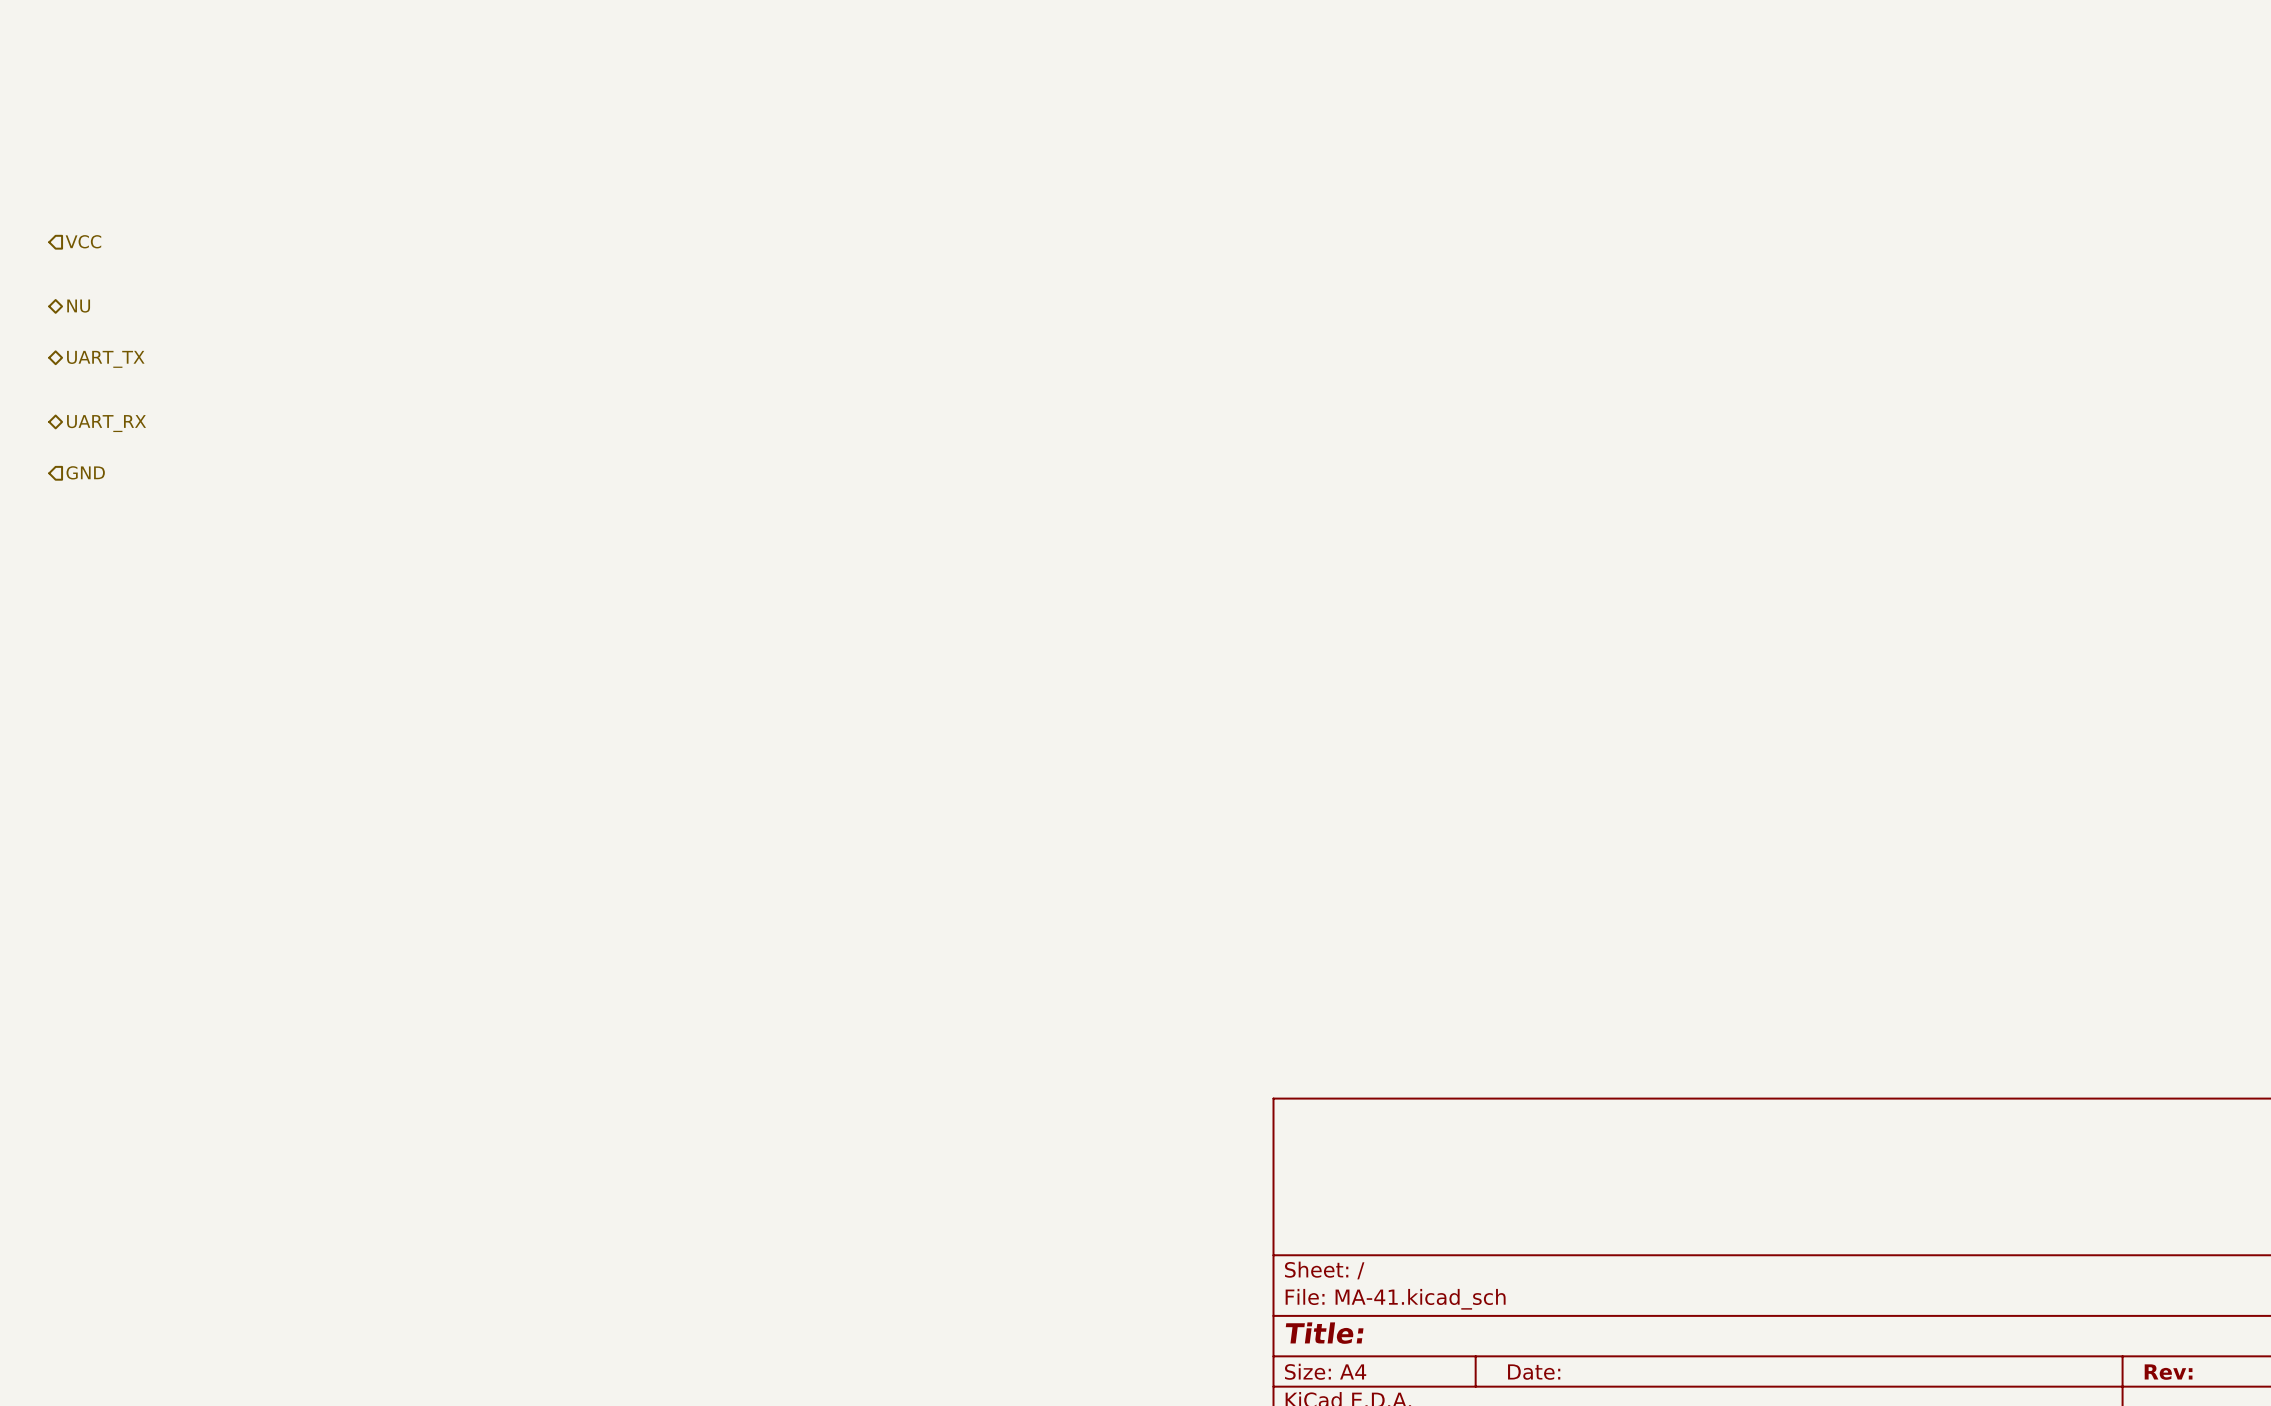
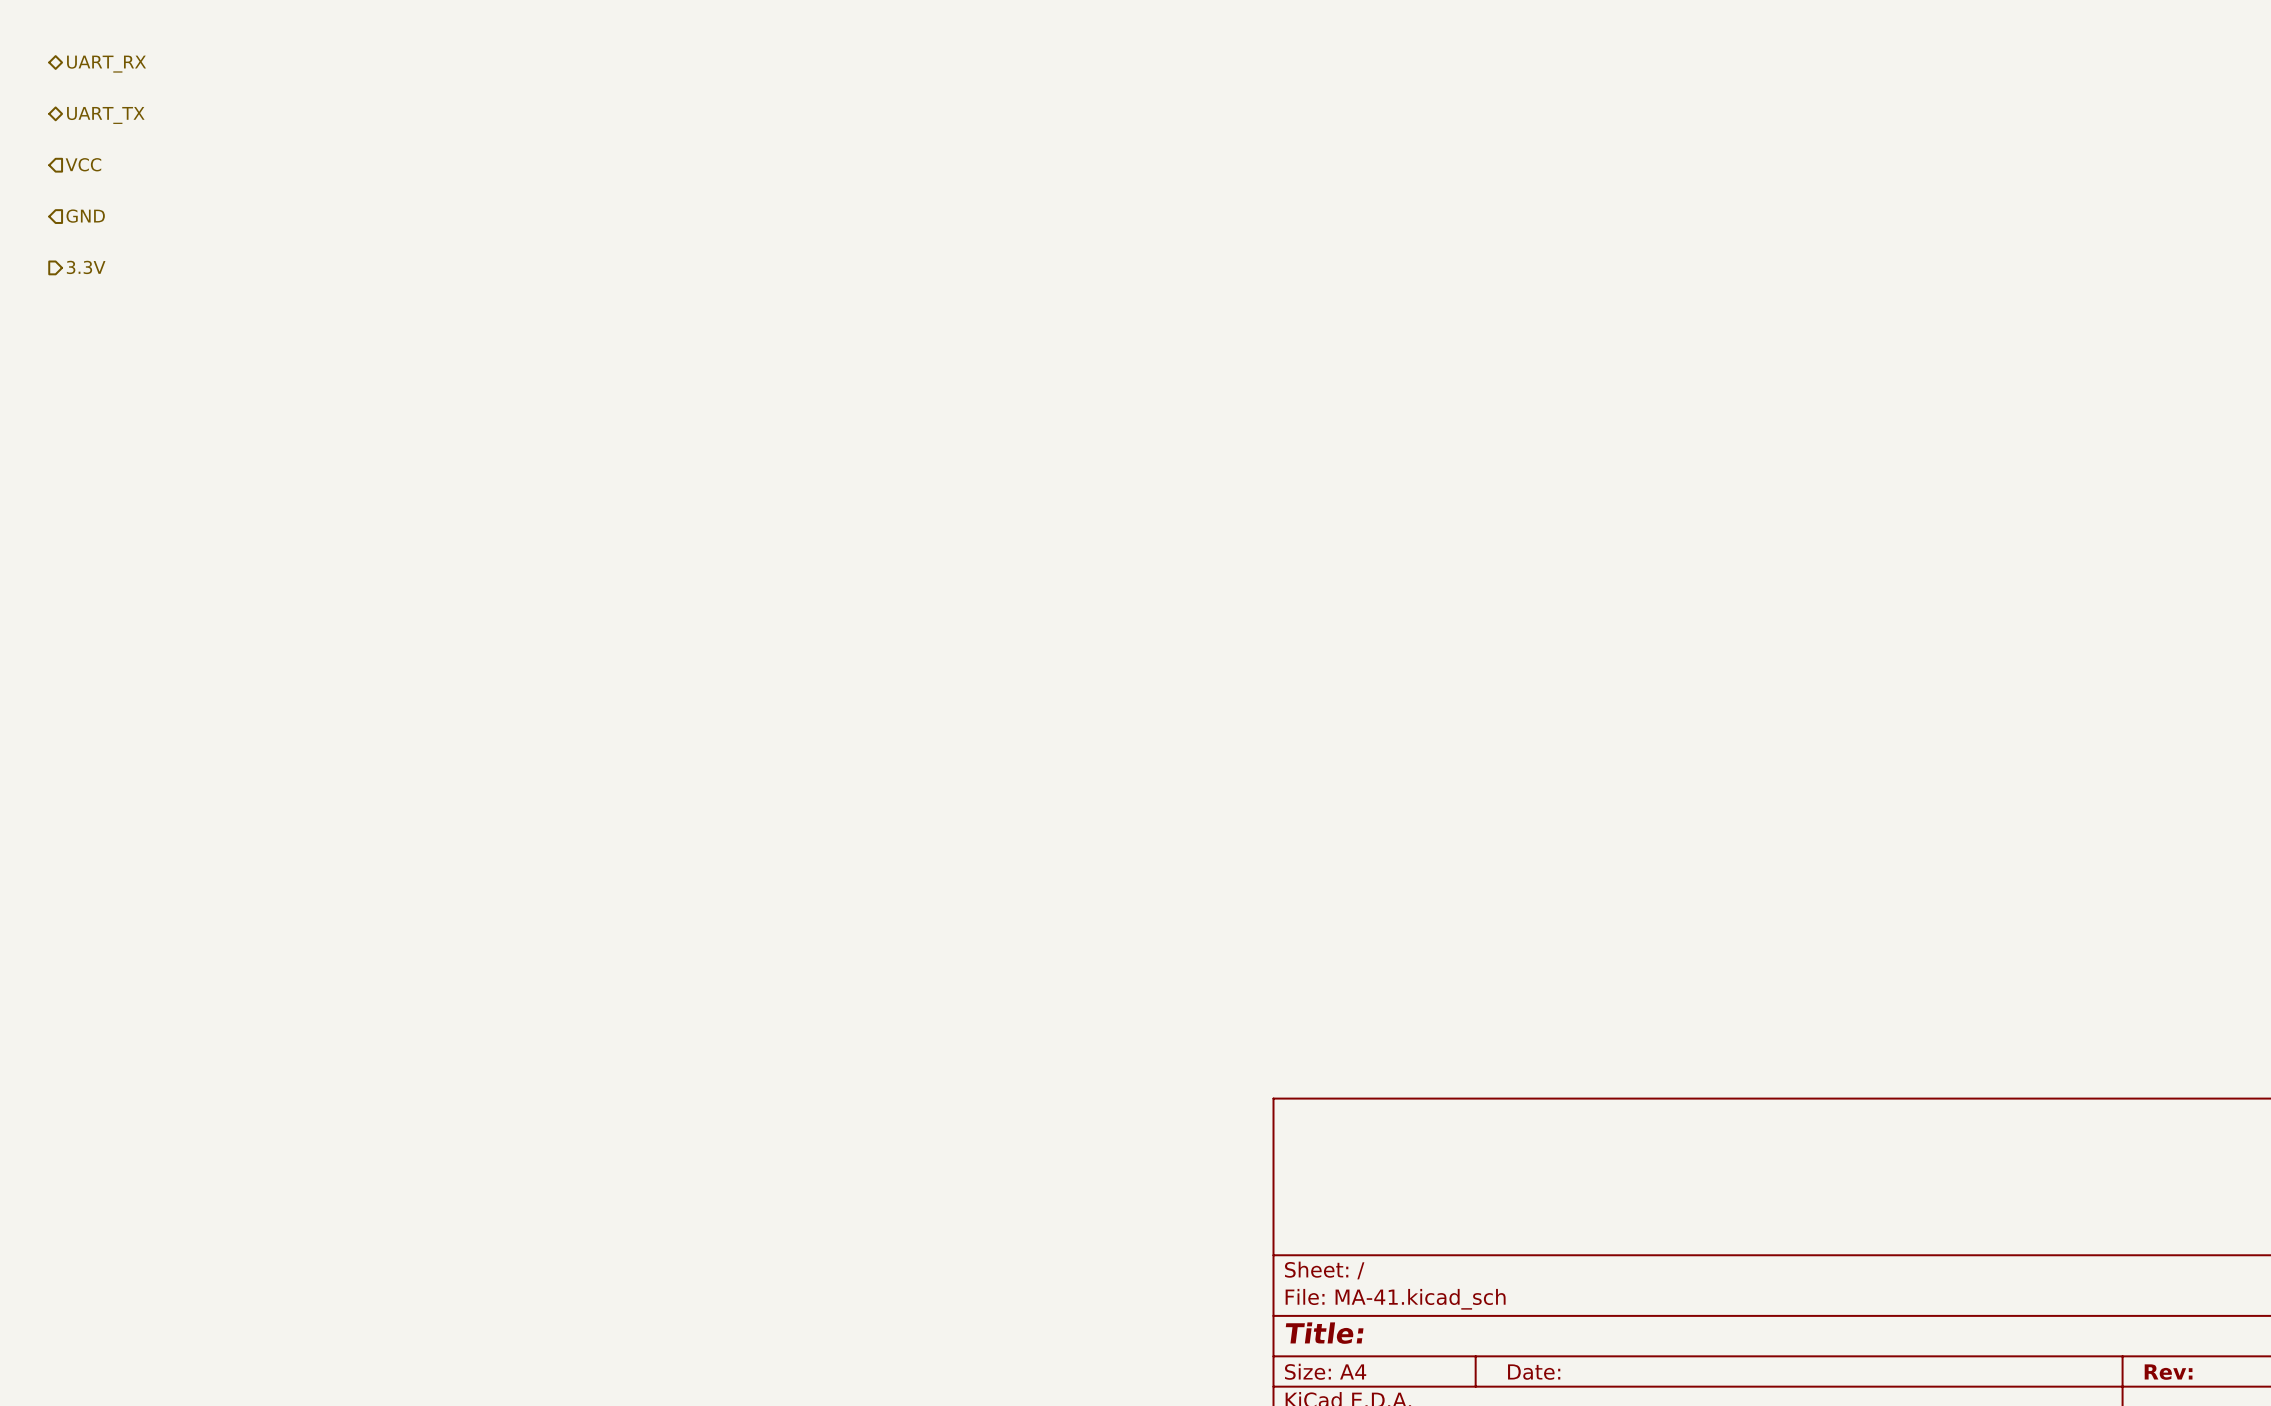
hierarchical label: none -> UART_RX (106, 64)
hierarchical label: none -> GND (85, 216)
hierarchical label position: VCC (83, 241) -> VCC (83, 164)
hierarchical label: none -> 3.3V (86, 267)
hierarchical label: NU (78, 306) -> none
hierarchical label position: UART_TX (105, 359) -> UART_TX (105, 115)
hierarchical label: UART_RX (106, 423) -> none
hierarchical label: GND (85, 472) -> none

